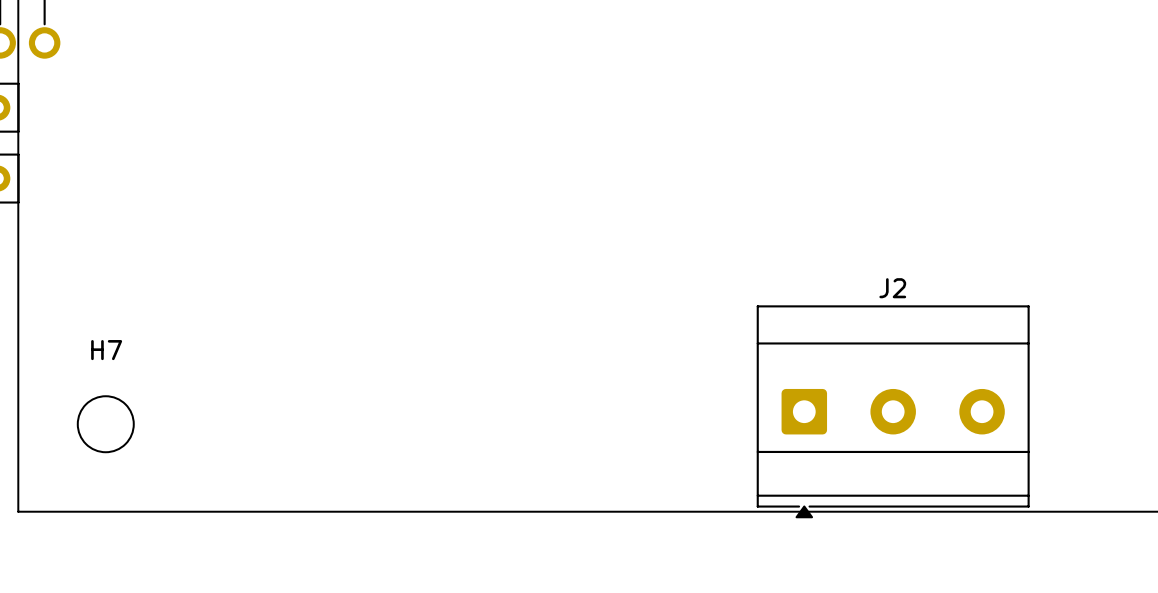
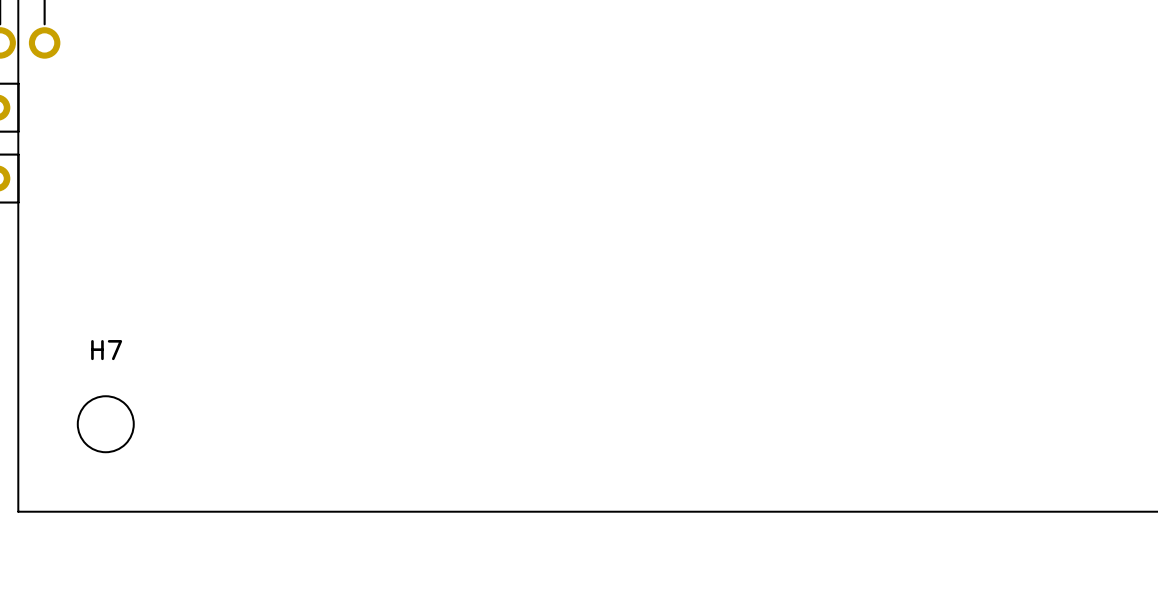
J2: (893, 411) -> none

